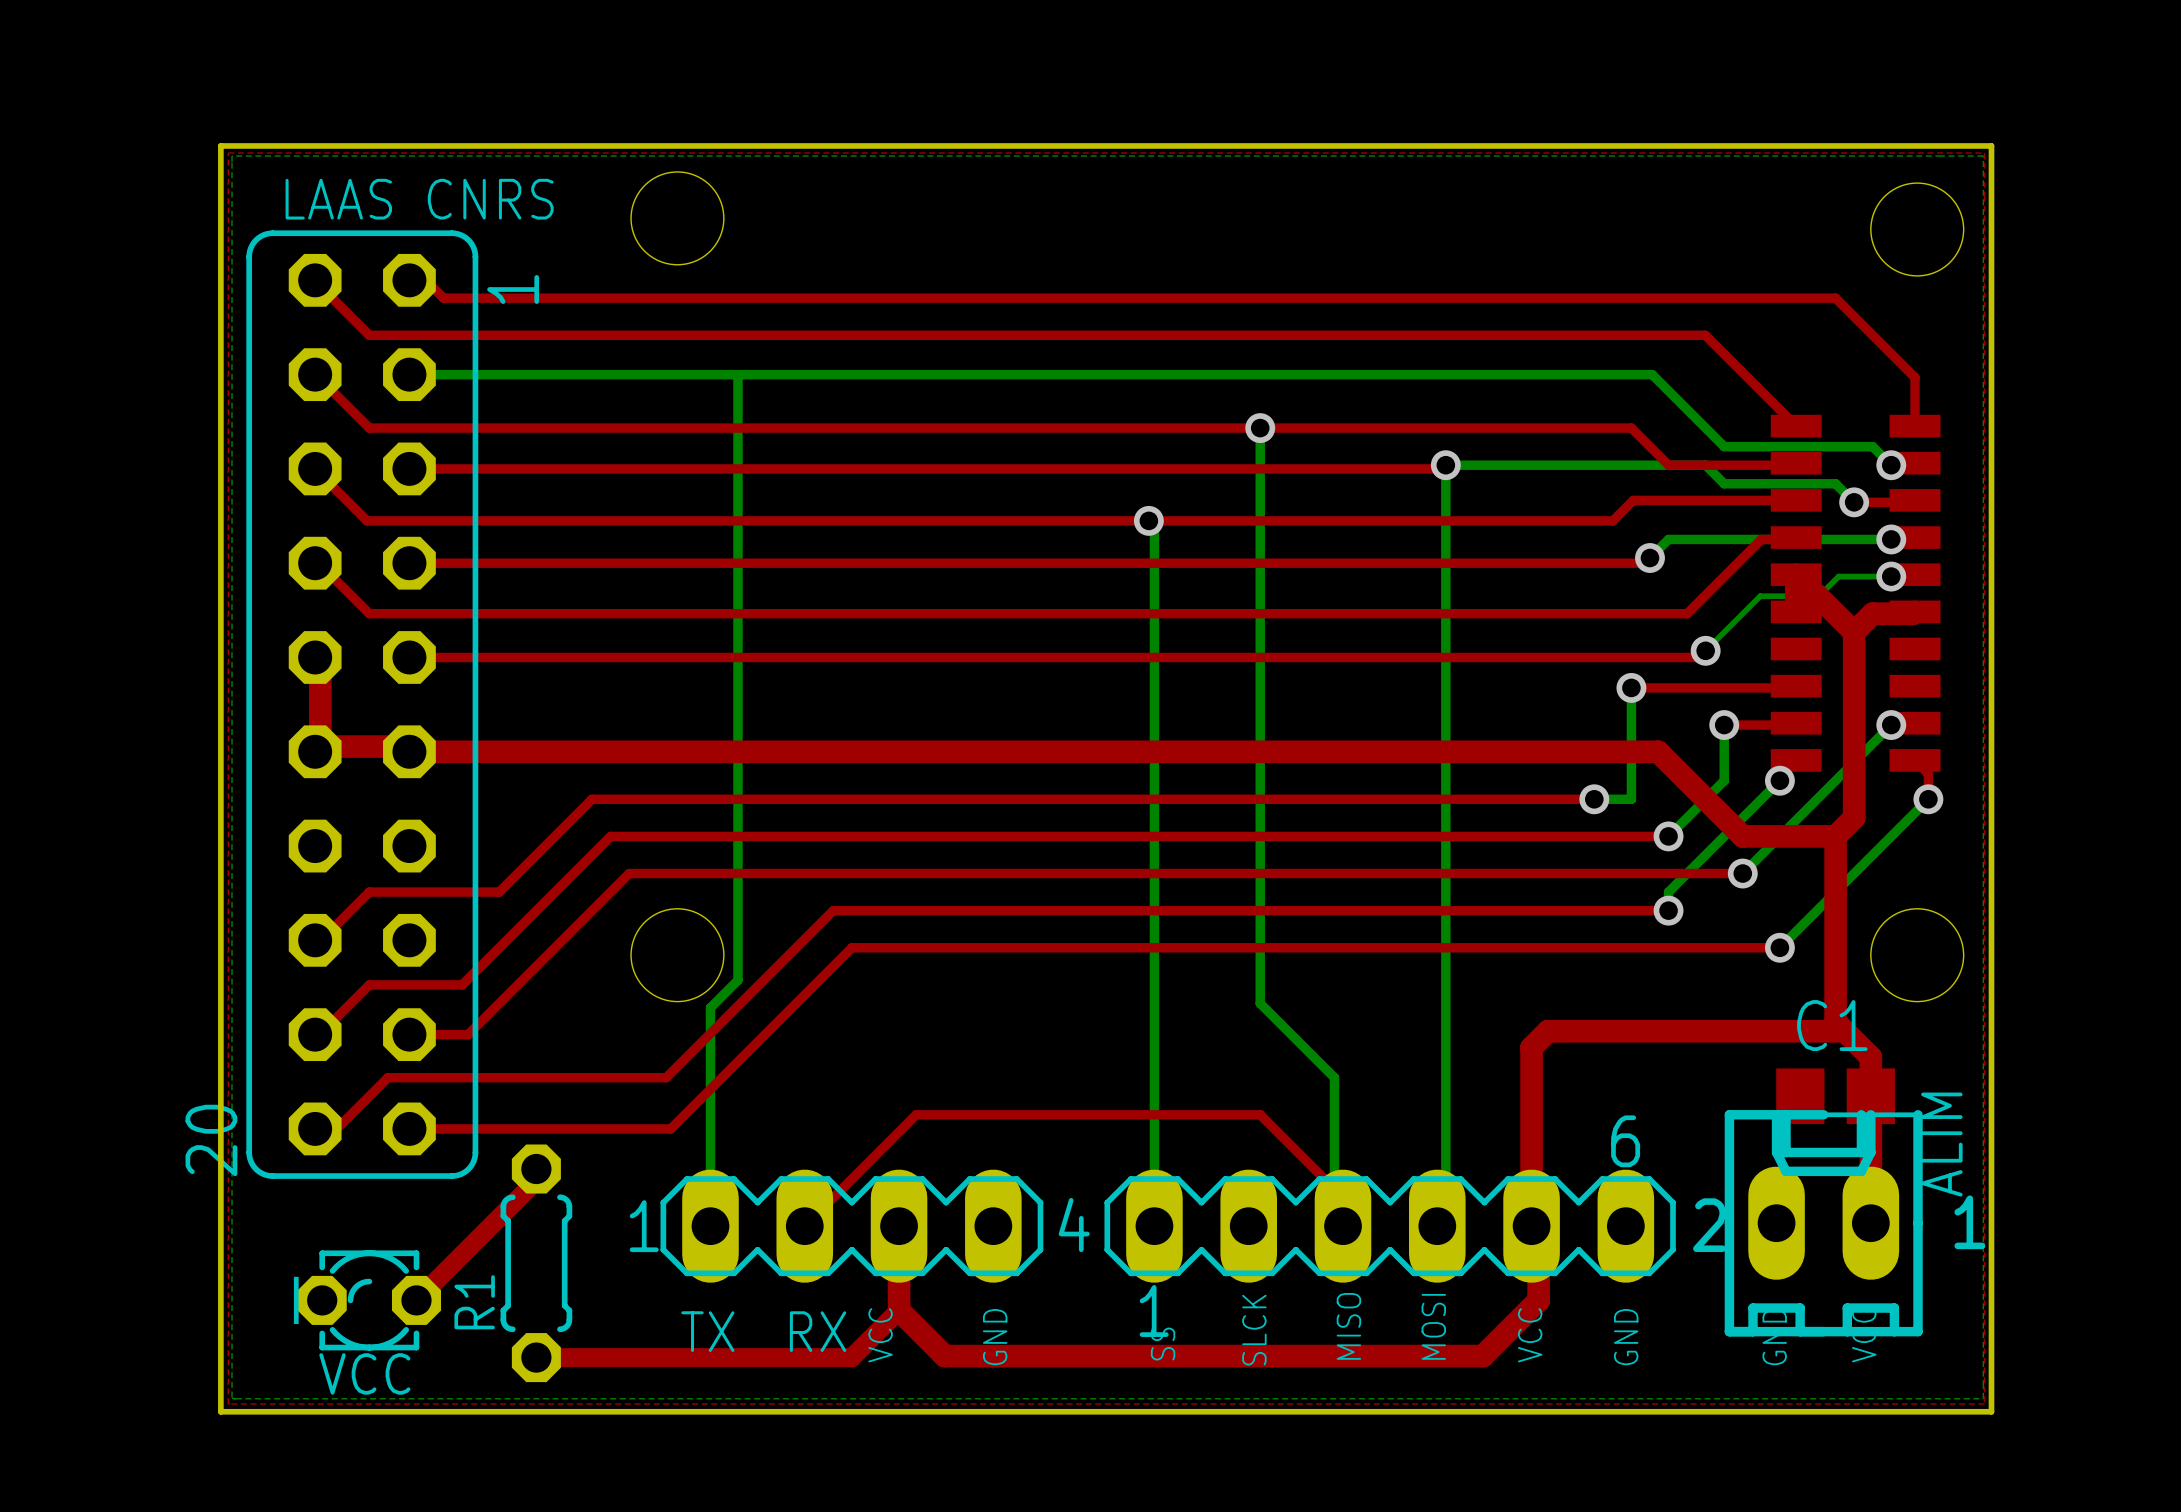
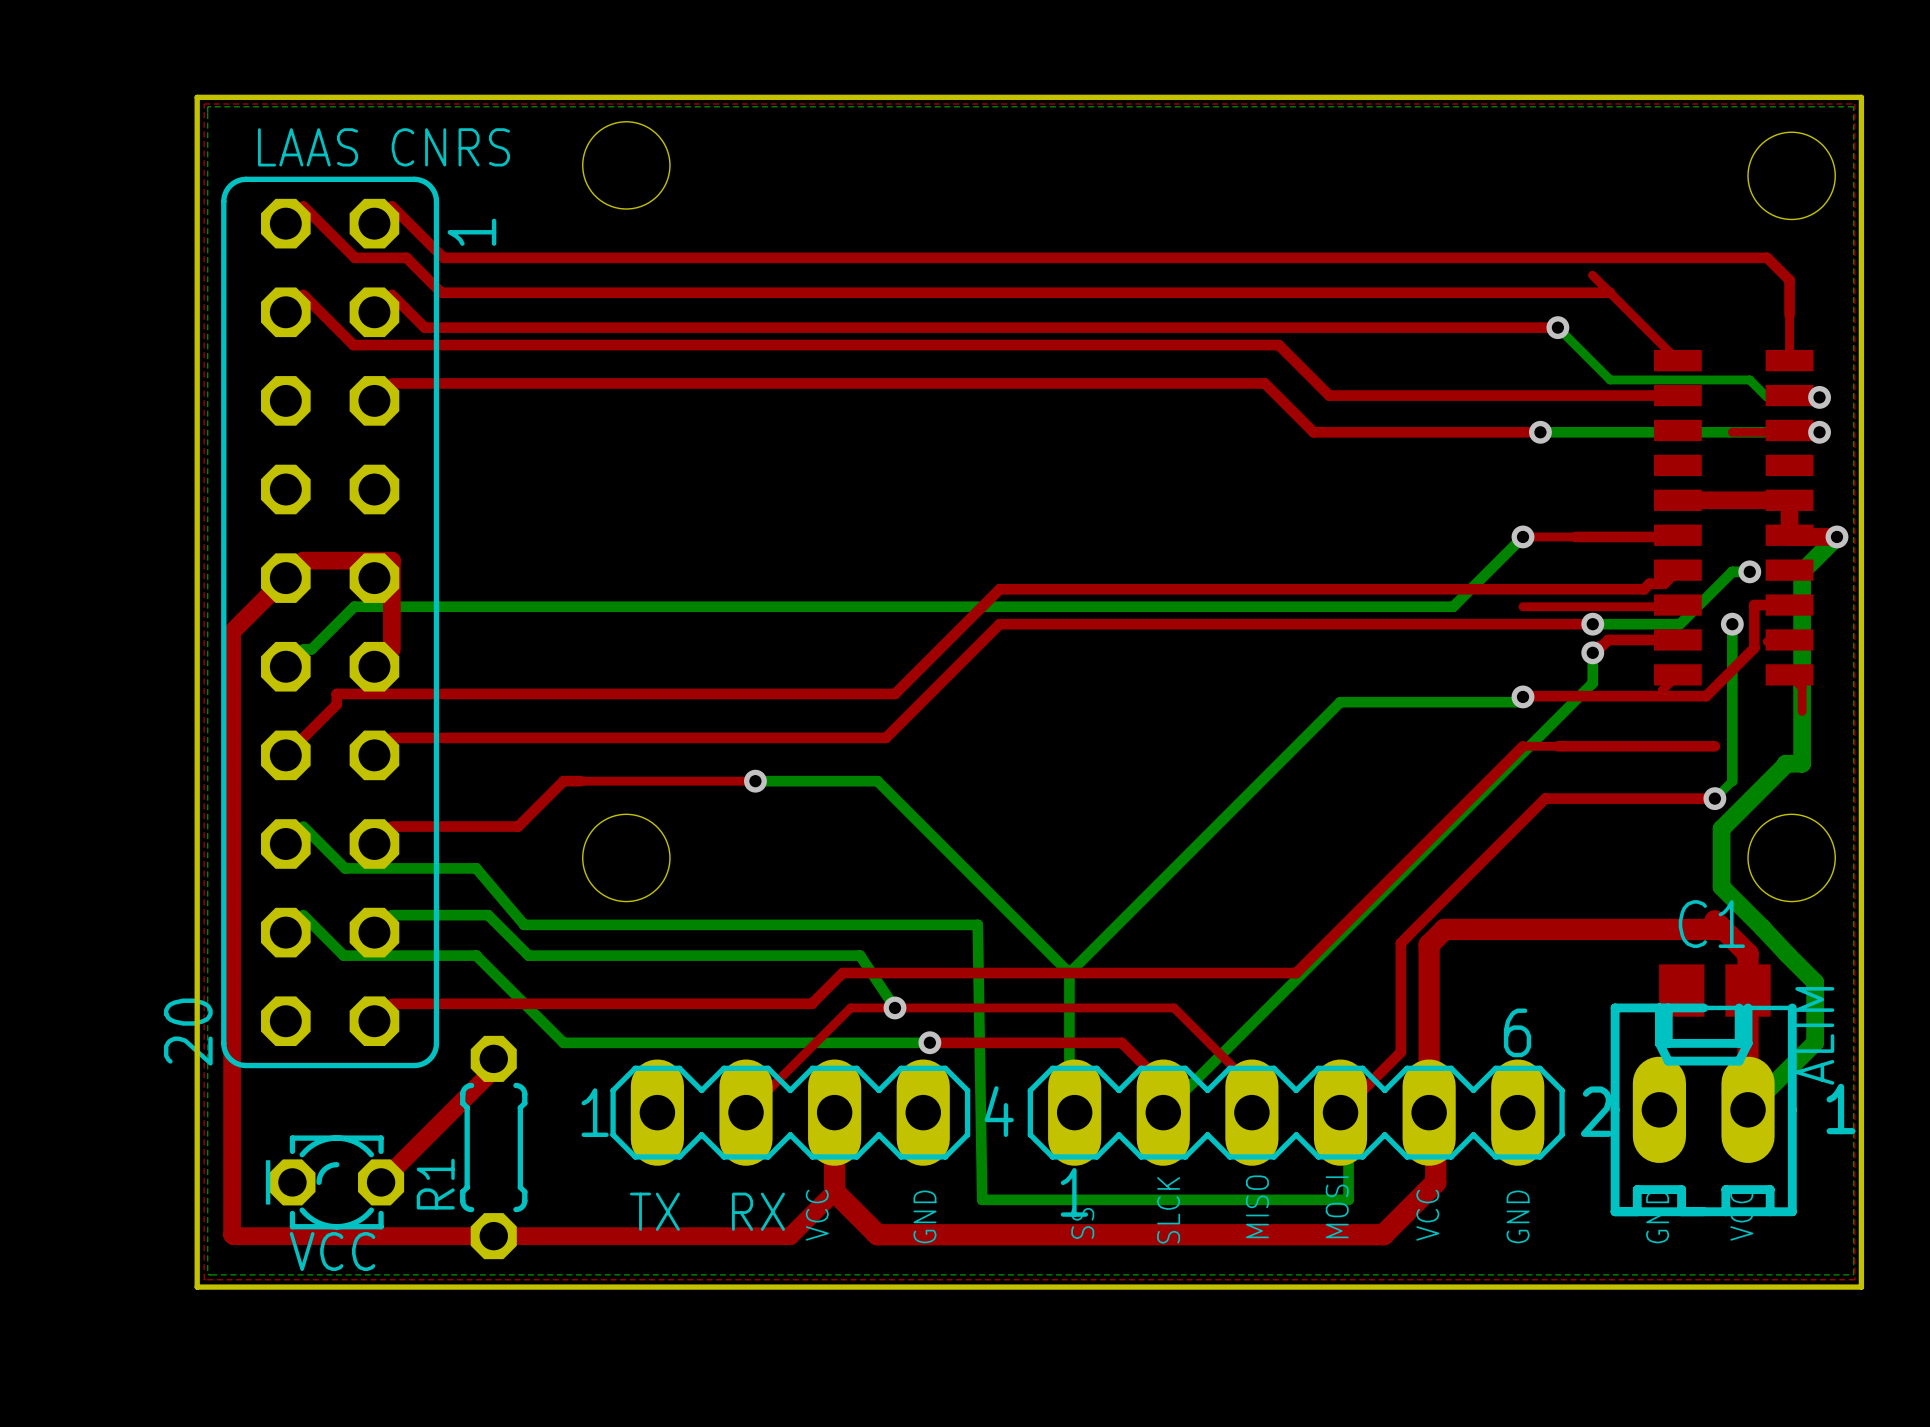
top track: none -> (303, 206) (354, 257) (406, 257) (441, 292) (1610, 292)
top track: (409, 280) (425, 280) (443, 298) (1835, 298) (1915, 377) -> (391, 206) (443, 257) (1767, 257) (1789, 280) (1789, 315)
top track: (315, 281) (369, 335) (1705, 335) -> none
top track: none -> (391, 294) (424, 327) (1557, 327)
top track: (315, 374) (369, 428) (1631, 428) (1668, 465) (1794, 465) (1796, 463) -> (303, 294) (353, 345) (1278, 345) (1329, 395) (1677, 395)
bottom track: (409, 374) (1652, 374) (1668, 390) -> none
bottom track: (740, 374) (737, 377) (737, 980) (710, 1007) (710, 1226) -> none
via: none -> (1557, 327)
via: (1260, 428) -> none
bottom track: (1253, 435) (1260, 428) (1260, 1003) (1334, 1077) (1334, 1217) (1343, 1226) -> none
top track: none -> (391, 383) (1264, 383) (1313, 432) (1540, 432)
top track: (1445, 465) (1442, 468) (409, 468) -> none
via: (1445, 465) -> none
via: (1891, 465) -> none
via: none -> (1819, 397)
top track: (315, 468) (367, 520) (1612, 520) (1633, 500) (1796, 500) -> none
bottom track: none -> (1540, 432) (1819, 432)
via: none -> (1540, 432)
bottom track: (1854, 502) (1835, 483) (1724, 483) (1705, 465) (1445, 465) (1445, 1217) (1437, 1226) -> (303, 826) (345, 868) (476, 868) (524, 924) (977, 924) (982, 1199) (1348, 1199) (1348, 1120) (1340, 1112)
via: (1854, 502) -> none
via: none -> (1819, 432)
bottom track: (1148, 520) (1154, 526) (1154, 1226) -> (1069, 973) (1069, 1107) (1074, 1112)
via: (1148, 520) -> none
top track: (1796, 537) (1794, 539) (1761, 539) (1687, 613) -> (1677, 535) (1676, 536) (1575, 536)
bottom track: (1891, 539) (1668, 539) (1649, 558) -> none
via: (1891, 539) -> none
top track: (1649, 558) (1644, 563) (409, 563) -> none
via: (1649, 558) -> none
top track: (315, 563) (318, 563) (369, 613) (1631, 613) -> none
top track: (1796, 574) (1796, 611) (1812, 595) (1817, 595) (1854, 632) -> (1677, 500) (1789, 500) (1789, 535) (1791, 536) (1836, 536)
bottom track: (1891, 576) (1838, 576) (1819, 596) (1760, 596) (1705, 650) -> none
via: (1891, 576) -> none
top track: (1915, 611) (1913, 613) (1872, 613) (1854, 632) -> none
bottom track: none -> (1522, 536) (1453, 606) (354, 606) (311, 649) (303, 649)
via: none -> (1522, 536)
bottom track: none -> (1836, 536) (1802, 571) (1802, 763) (1785, 763) (1721, 828) (1721, 886) (1815, 982) (1815, 1042) (1748, 1109) (1730, 1092)
via: none -> (1836, 536)
top track: (1854, 632) (1854, 817) (1835, 836) (1835, 1022) -> none
top track: none -> (1677, 570) (1664, 583) (1649, 583) (1644, 589) (999, 589) (894, 693) (336, 693) (336, 704) (303, 737)
top track: (1705, 650) (1698, 657) (409, 657) -> none
via: (1705, 650) -> none
bottom track: none -> (1749, 571) (1732, 571) (1679, 624) (1592, 624)
via: none -> (1749, 571)
top track: (315, 657) (320, 657) (320, 746) -> none
top track: none -> (1789, 605) (1754, 605) (1754, 648) (1706, 696) (1522, 696)
bottom track: (1631, 687) (1631, 783) -> none
via: (1631, 687) -> none
top track: none -> (1592, 624) (999, 624) (885, 737) (391, 737)
via: none -> (1592, 624)
via: none -> (1732, 624)
top track: (1796, 723) (1794, 725) (1724, 725) -> (1677, 639) (1608, 639) (1592, 652)
bottom track: (1724, 725) (1724, 780) (1668, 836) -> none
via: (1724, 725) -> none
bottom track: (1891, 725) (1742, 873) -> none
via: (1891, 725) -> none
top track: none -> (391, 649) (391, 560) (303, 560) (232, 631) (232, 1234) (493, 1236)
bottom track: none -> (1592, 652) (1592, 683) (1163, 1112)
via: none -> (1592, 652)
top track: (320, 746) (404, 746) (409, 751) (1658, 751) (1742, 836) -> (1557, 746) (1627, 746)
bottom track: (1779, 780) (1668, 892) (1668, 910) -> none
via: (1779, 780) -> none
via: none -> (1522, 696)
bottom track: (1631, 788) (1631, 799) (1594, 799) -> (1522, 701) (1340, 702) (1069, 973)
top track: (1594, 799) (592, 799) (499, 892) (369, 892) (321, 940) (315, 940) -> none
via: (1594, 799) -> none
bottom track: (1928, 799) (1854, 873) -> (1732, 624) (1732, 781)
via: (1928, 799) -> none
top track: (1631, 836) (610, 836) (462, 984) (369, 984) (319, 1034) (315, 1034) -> (1522, 746) (1296, 973) (842, 973) (811, 1003) (391, 1003)
via: (1668, 836) -> none
top track width: thick (1742, 836) (1835, 836) -> thin (1627, 746) (1714, 746)
top track: (629, 873) (468, 1034) (409, 1034) -> (580, 781) (563, 781) (518, 826) (391, 826)
top track: (814, 873) (1742, 873) -> none
bottom track: none -> (755, 781) (877, 781) (1069, 973)
via: none -> (755, 781)
via: (1742, 873) -> none
top track: none -> (1714, 798) (1545, 798) (1407, 936)
bottom track: (1835, 892) (1779, 947) -> none
via: none -> (1714, 798)
top track: (1668, 910) (833, 910) (666, 1077) (387, 1077) (336, 1128) (315, 1128) -> none
via: (1668, 910) -> none
top track: (1779, 947) (851, 947) (670, 1128) (409, 1128) -> none
via: (1779, 947) -> none
bottom track: none -> (303, 915) (343, 955) (476, 955) (563, 1042) (929, 1042)
bottom track: none -> (391, 915) (488, 915) (528, 955) (860, 955) (894, 1007)
top track: none -> (1407, 936) (1400, 943) (1400, 1052) (1340, 1112)
via: none -> (894, 1007)
top track: none -> (930, 1042) (1121, 1042) (1163, 1084) (1163, 1112)
via: none -> (929, 1042)

